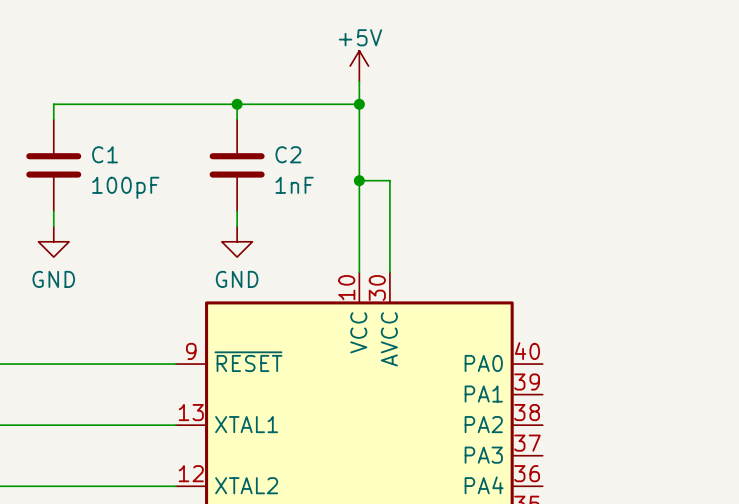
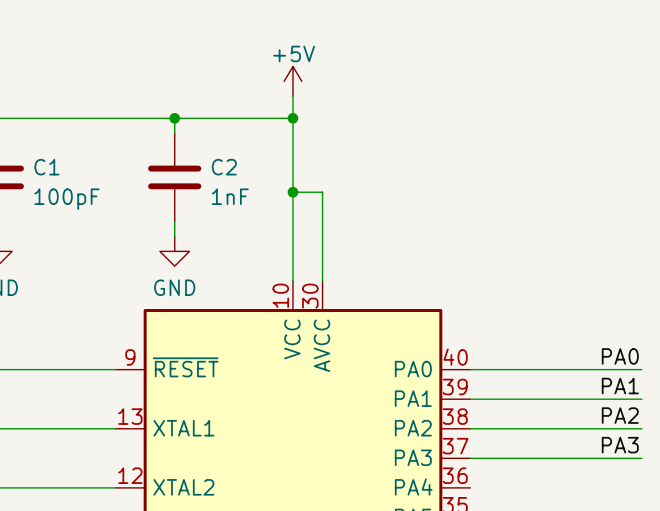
label: none -> PA0 (620, 356)
wire: none -> (470, 369) (641, 369)
label: none -> PA1 (620, 386)
wire: none -> (470, 399) (641, 399)
label: none -> PA2 (620, 415)
wire: none -> (470, 428) (641, 428)
label: none -> PA3 (620, 445)
wire: none -> (470, 458) (641, 458)

